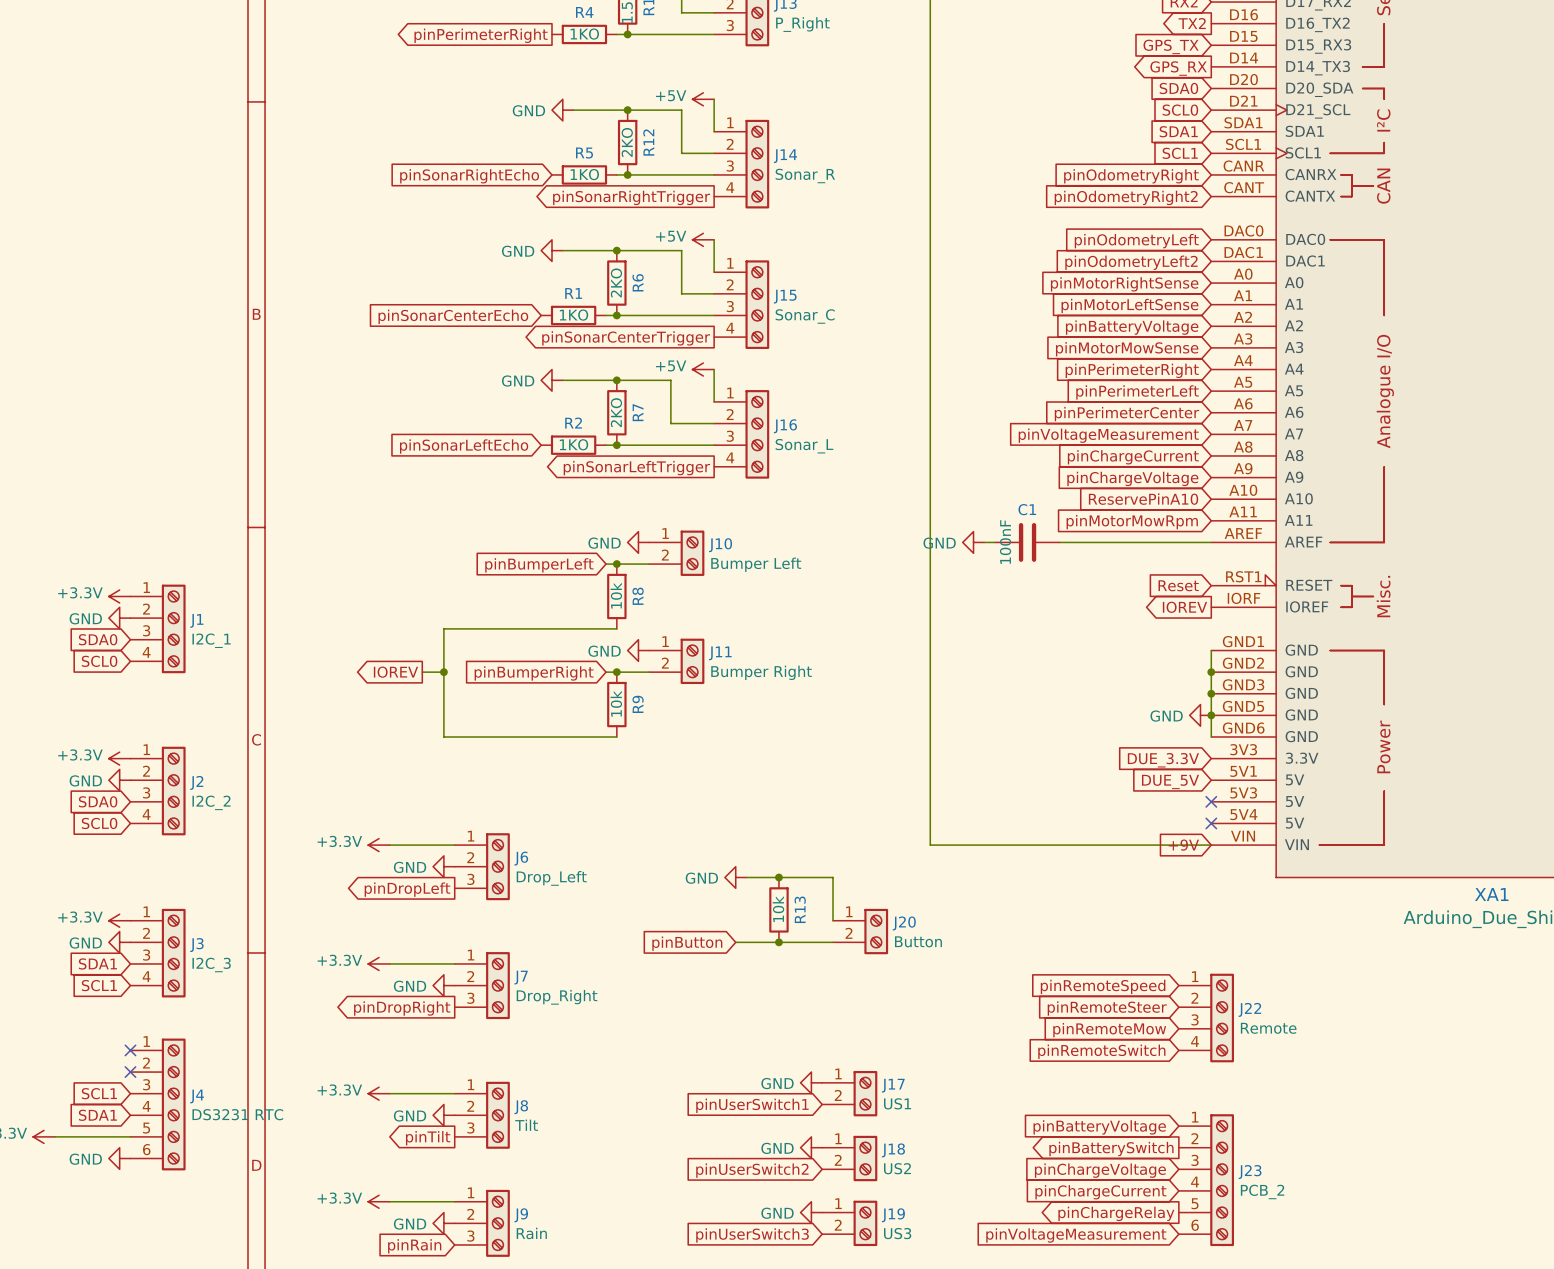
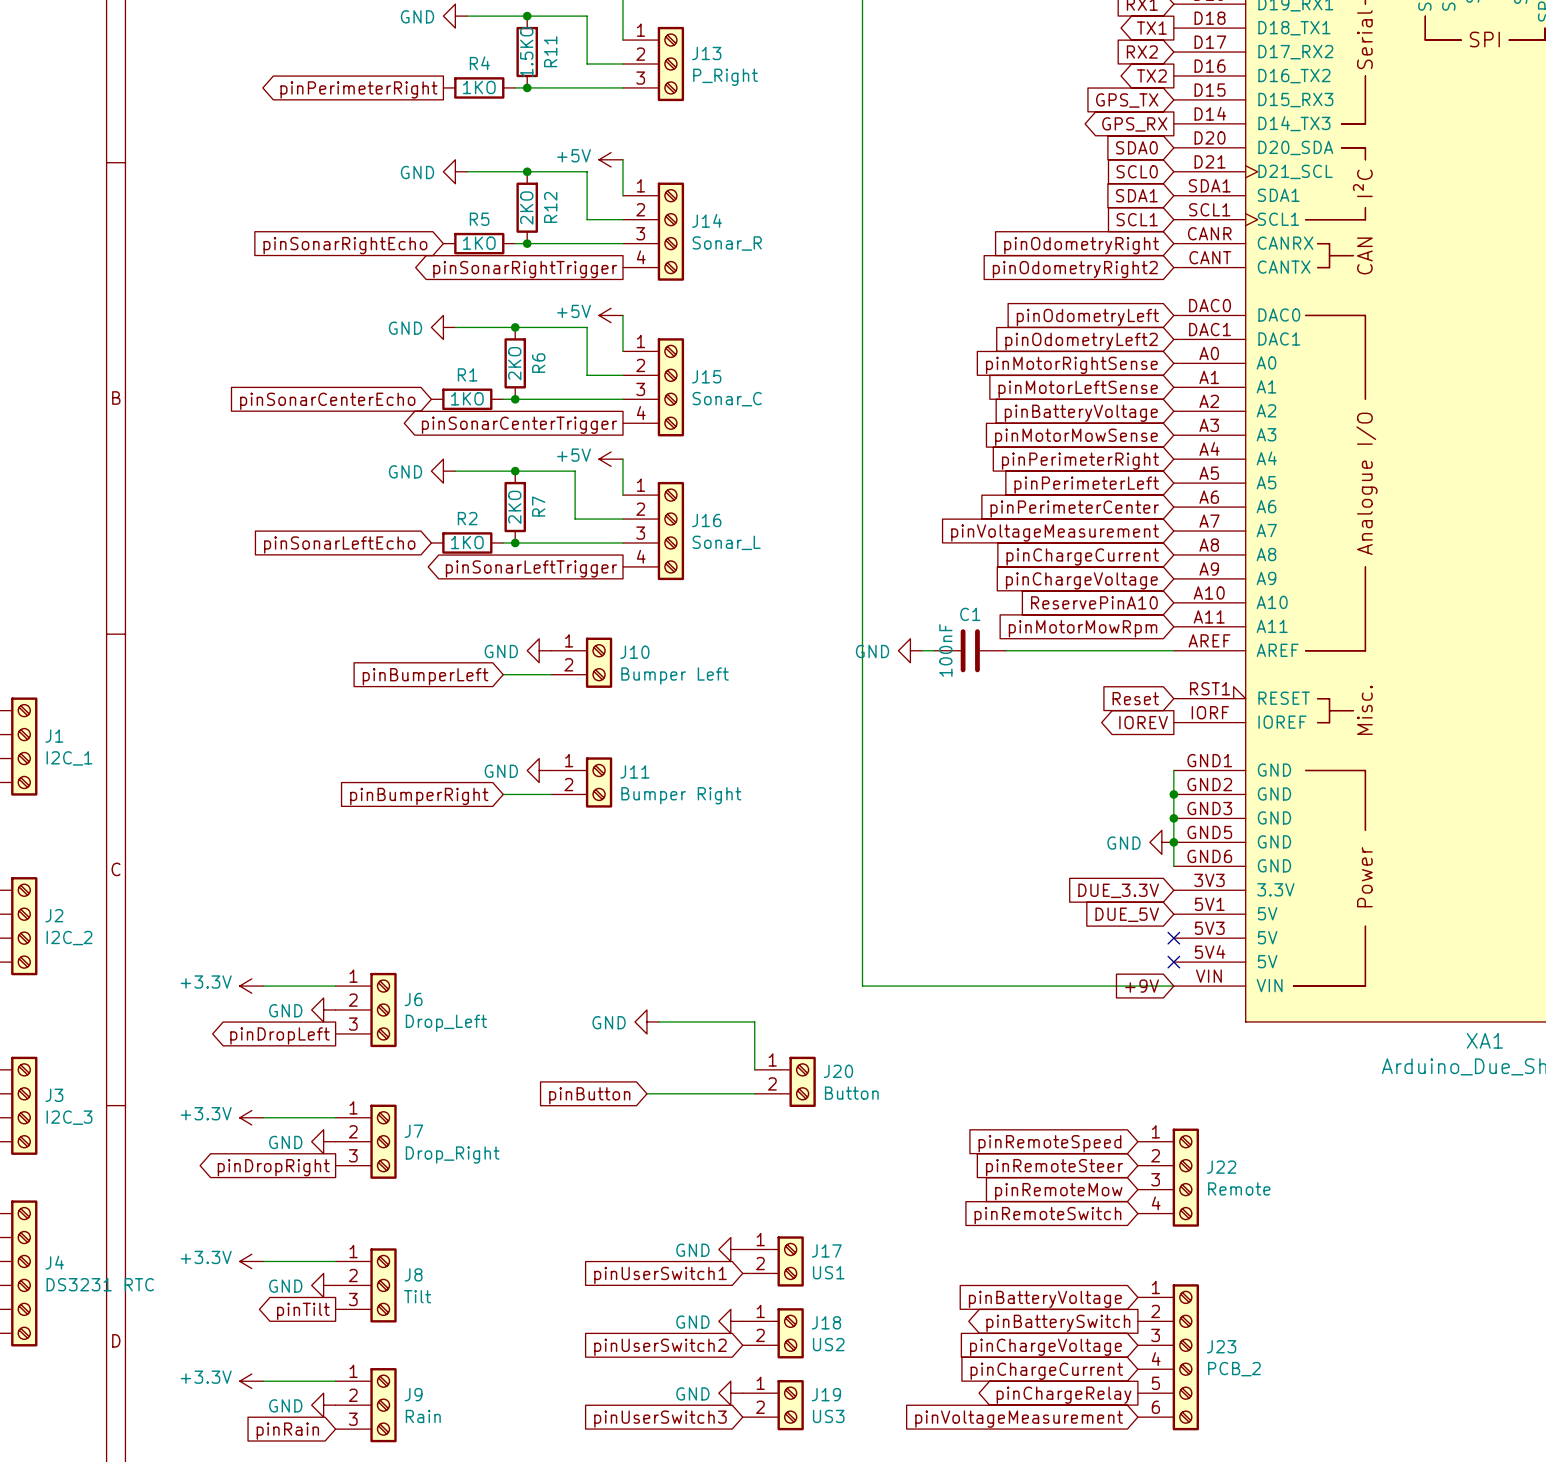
junction: (616, 564) -> none
R8: 10k (616, 596) -> none
wire: (616, 628) (443, 628) (443, 736) (616, 736) -> none
global label: IOREV (395, 672) -> none
wire: (422, 672) (443, 672) -> none
junction: (443, 672) -> none
junction: (616, 672) -> none
R9: 10k (616, 704) -> none
junction: (778, 877) -> none
R13: 10k (778, 909) -> none
junction: (778, 942) -> none

